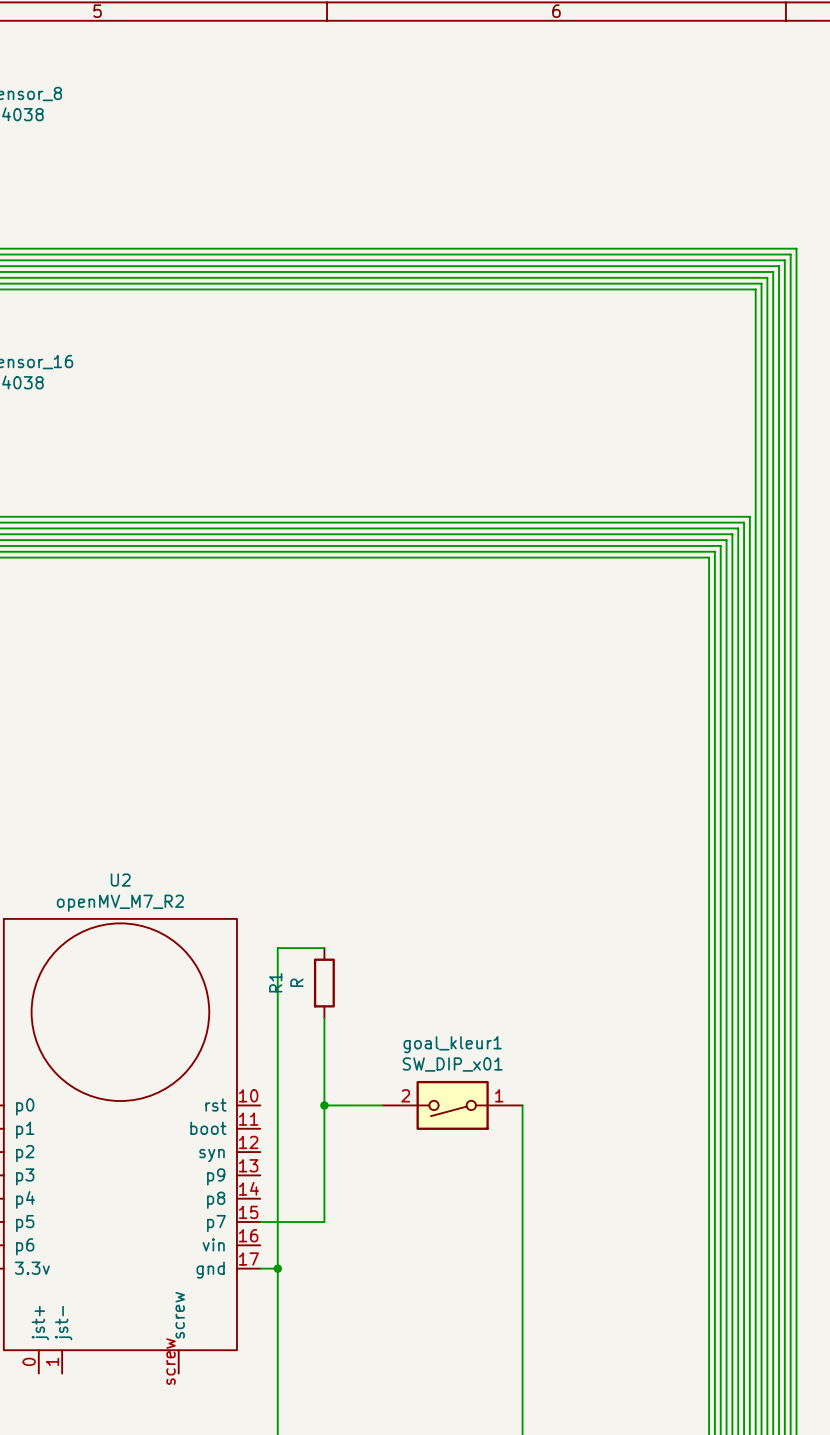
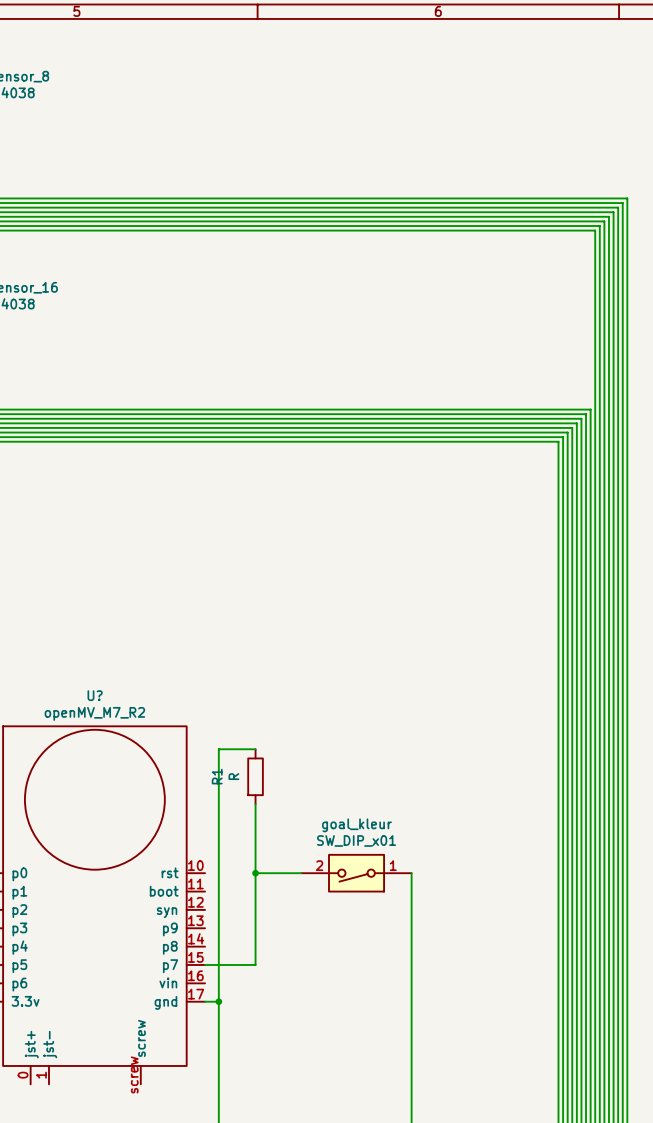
U2 name: U2 (120, 880) -> U? (95, 695)
goal_kleur1 name: goal_kleur1 (452, 1044) -> goal_kleur (356, 825)

